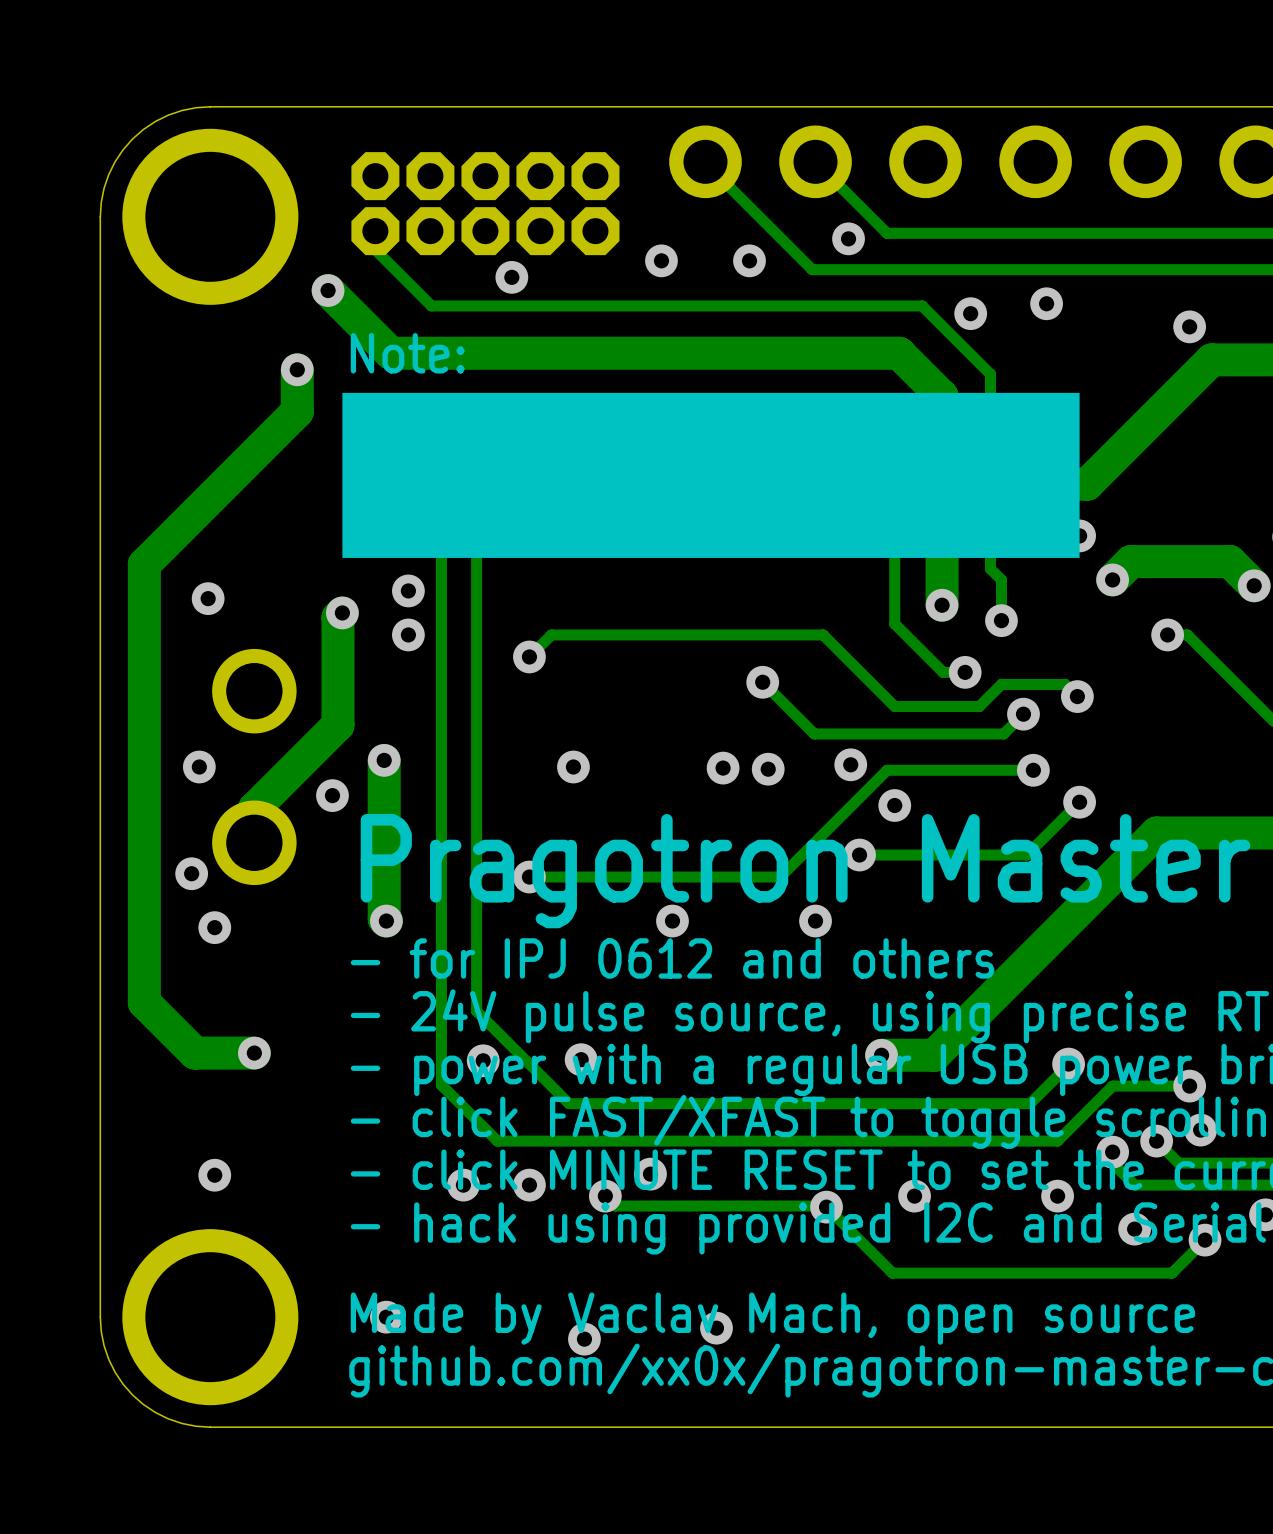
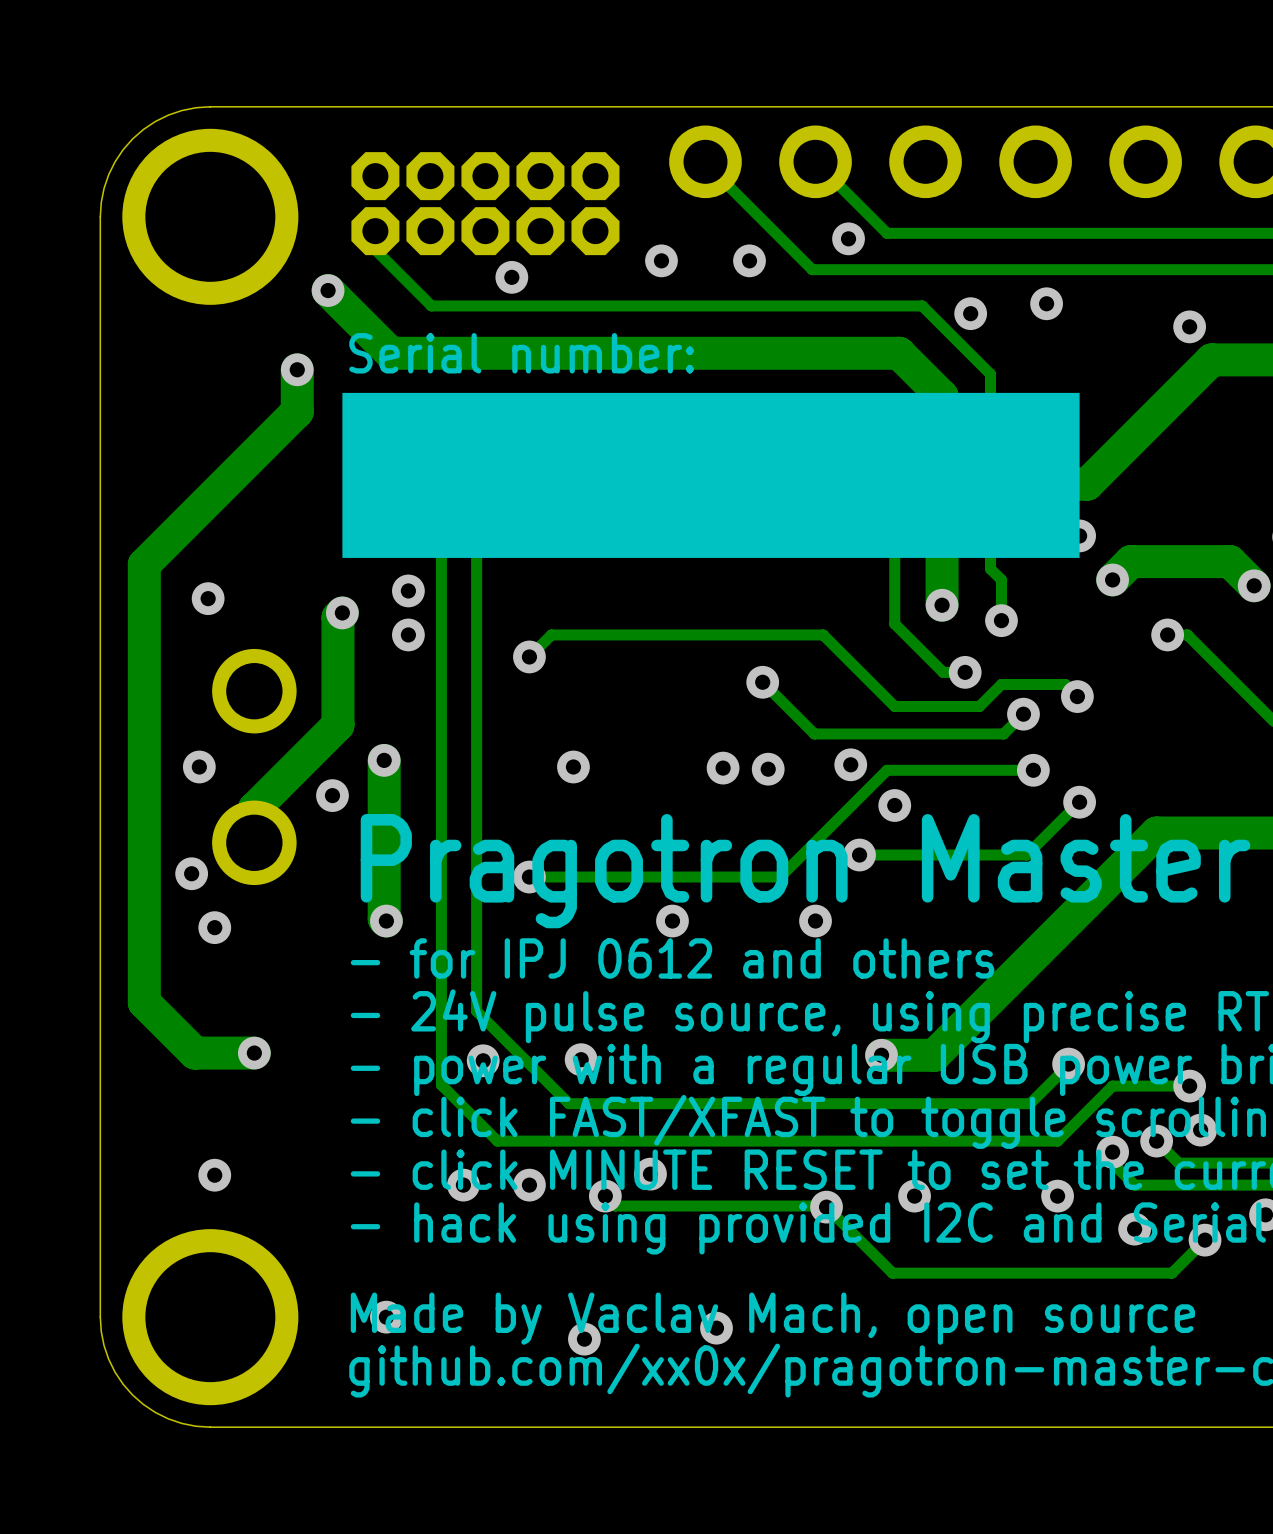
text: Note: (407, 353) -> Serial number: (521, 353)

